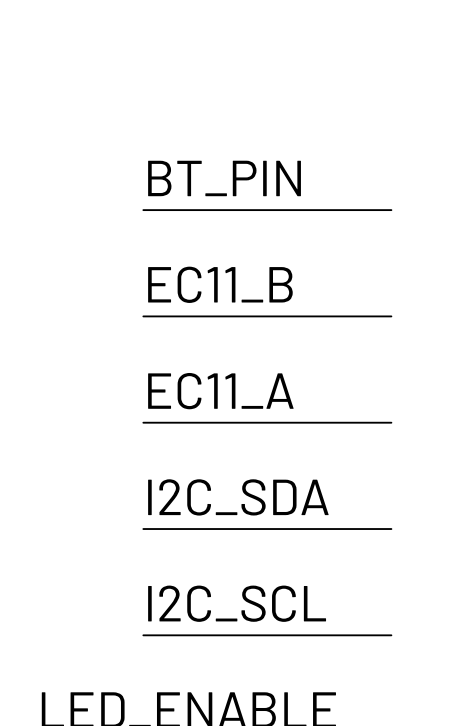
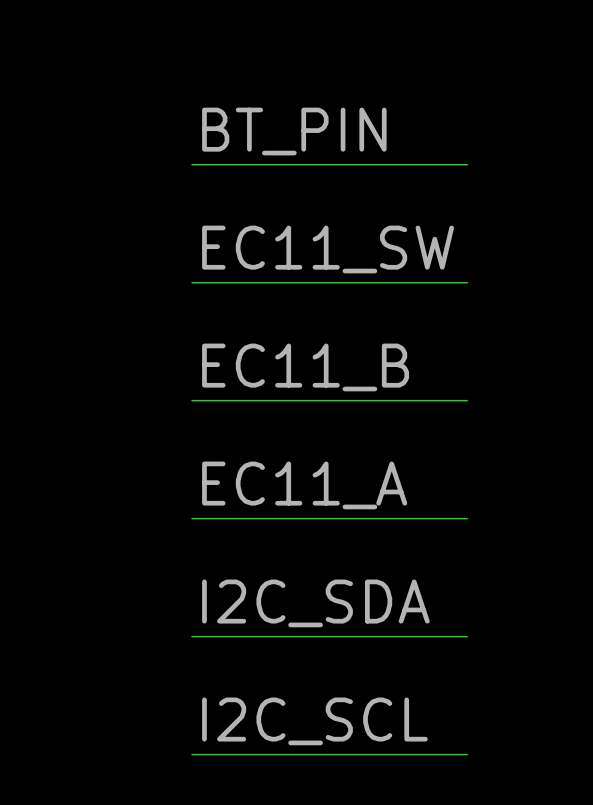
label: none -> BT_PIN (294, 131)
wire: none -> (192, 164) (467, 164)
label: BT_PIN (224, 178) -> EC11_SW (328, 249)

